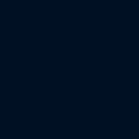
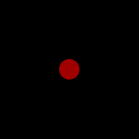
part: none -> (69, 69)

